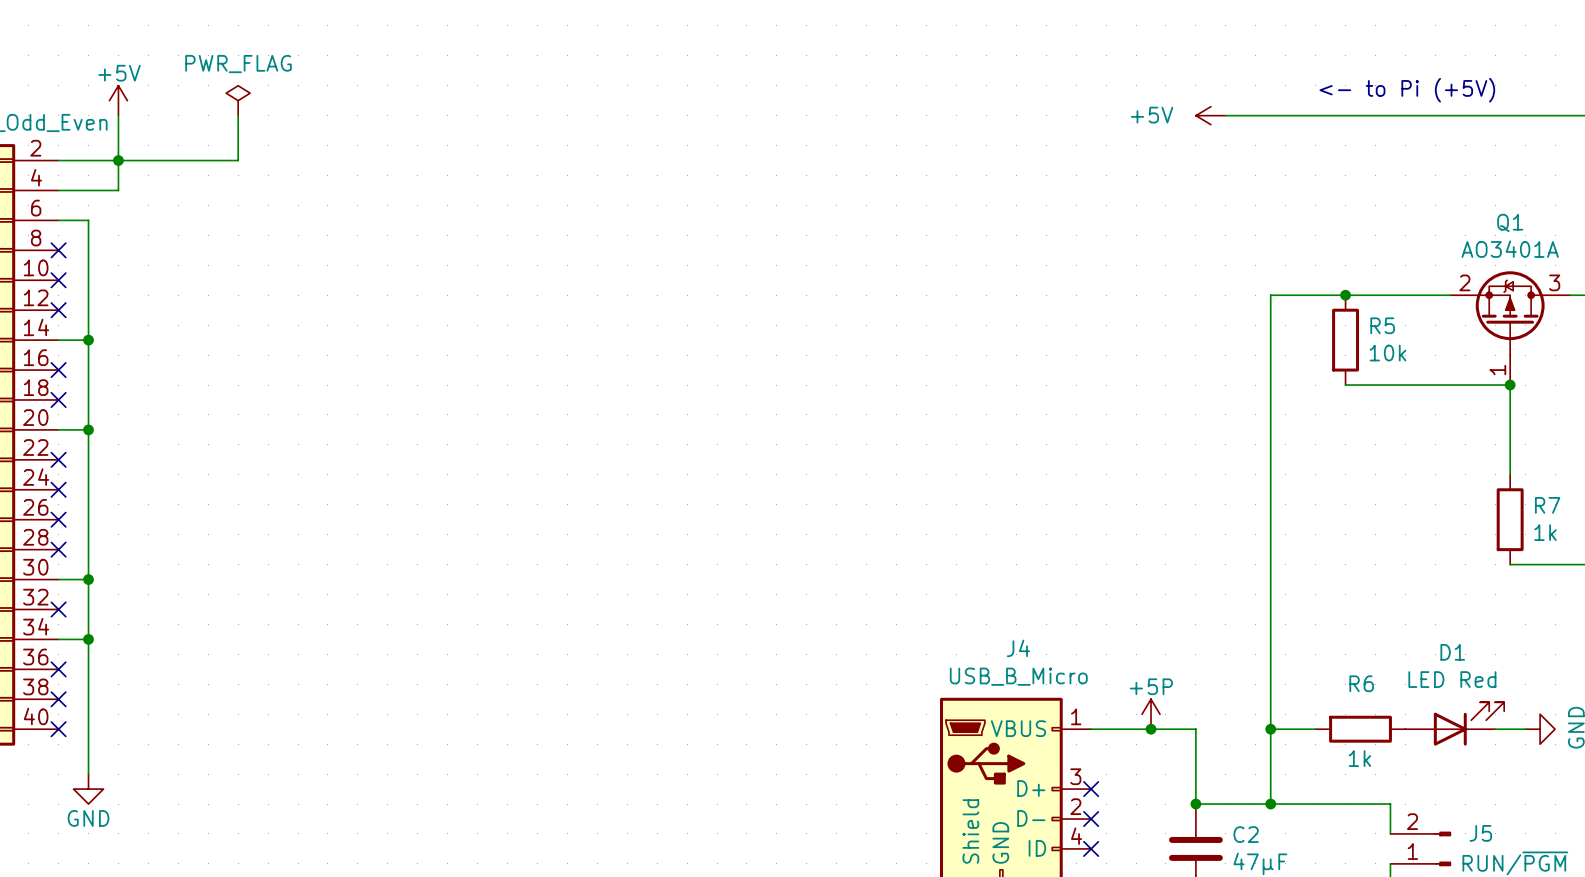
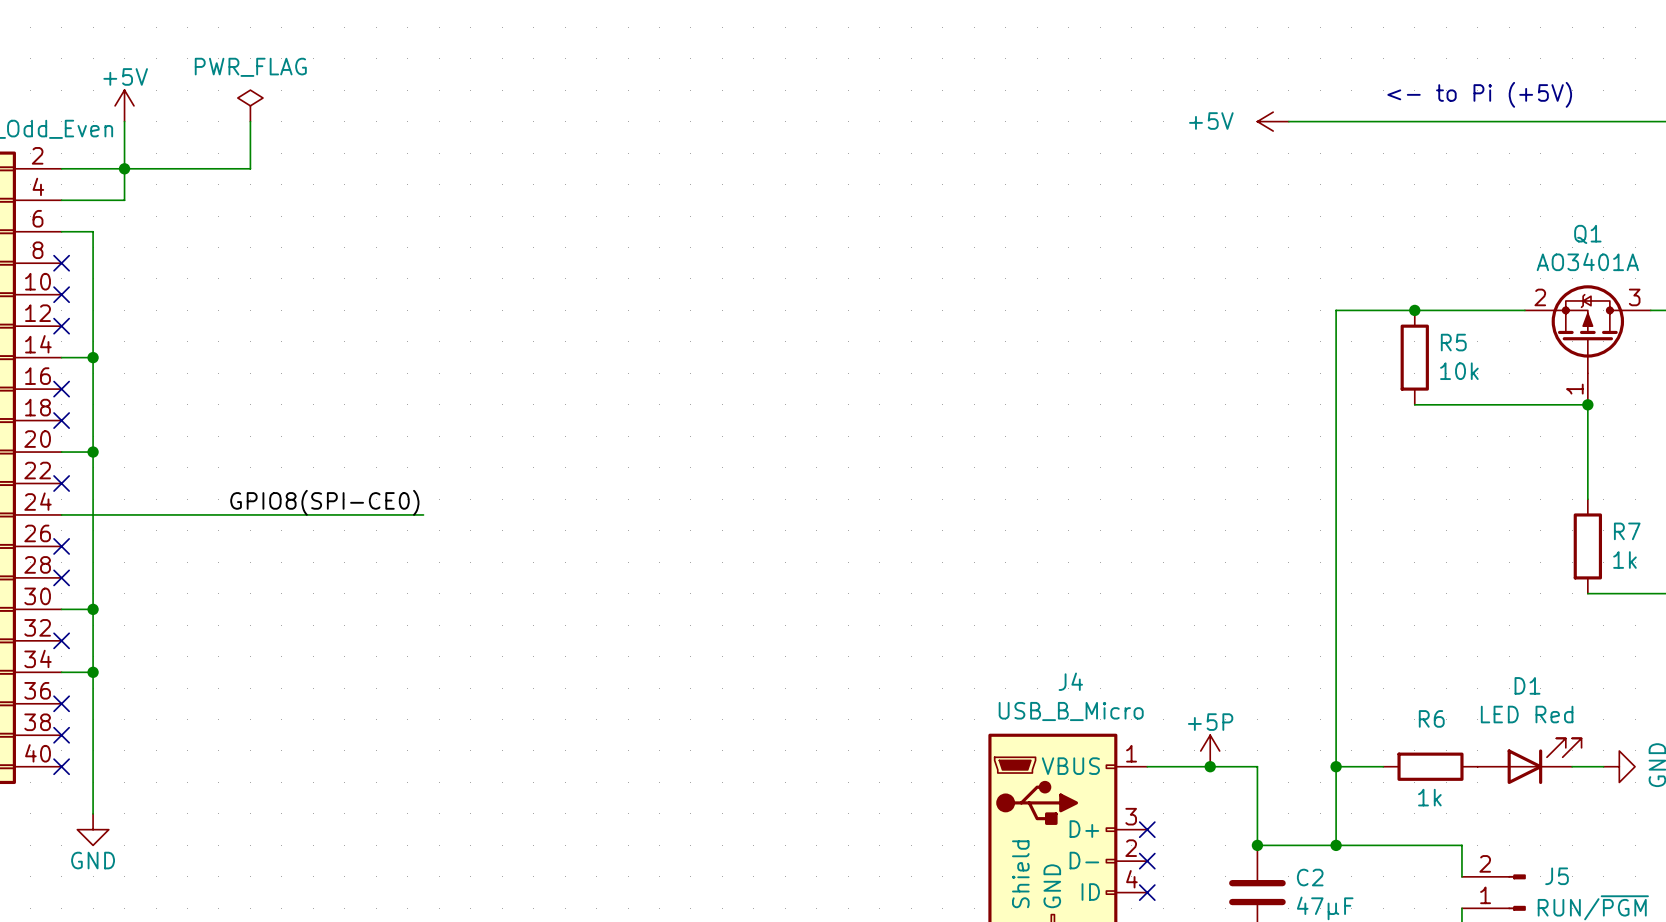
label: none -> GPIO8(SPI-CE0) (324, 502)
wire: none -> (61, 514) (423, 514)
no-connect mark: (58, 489) -> none

